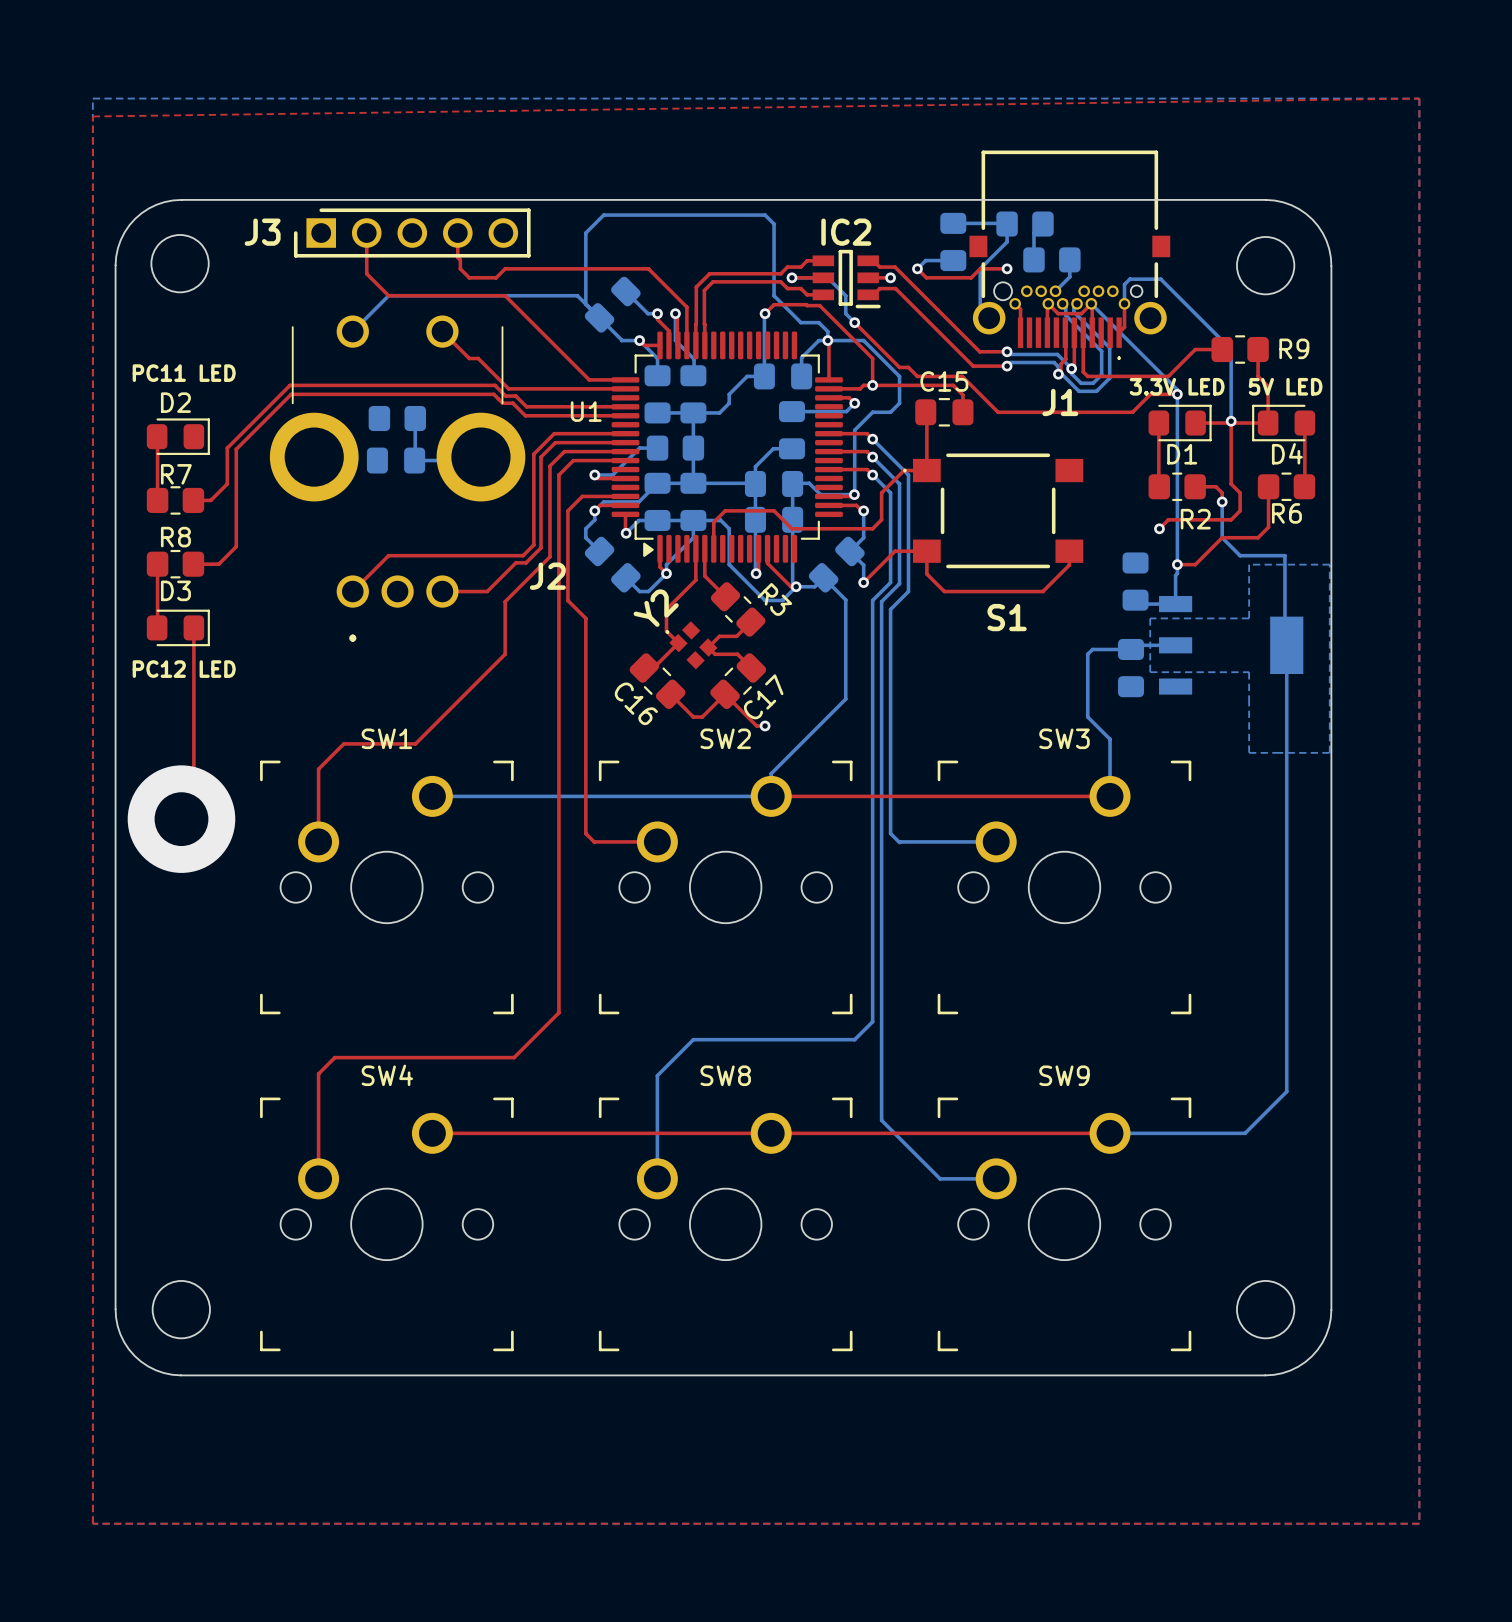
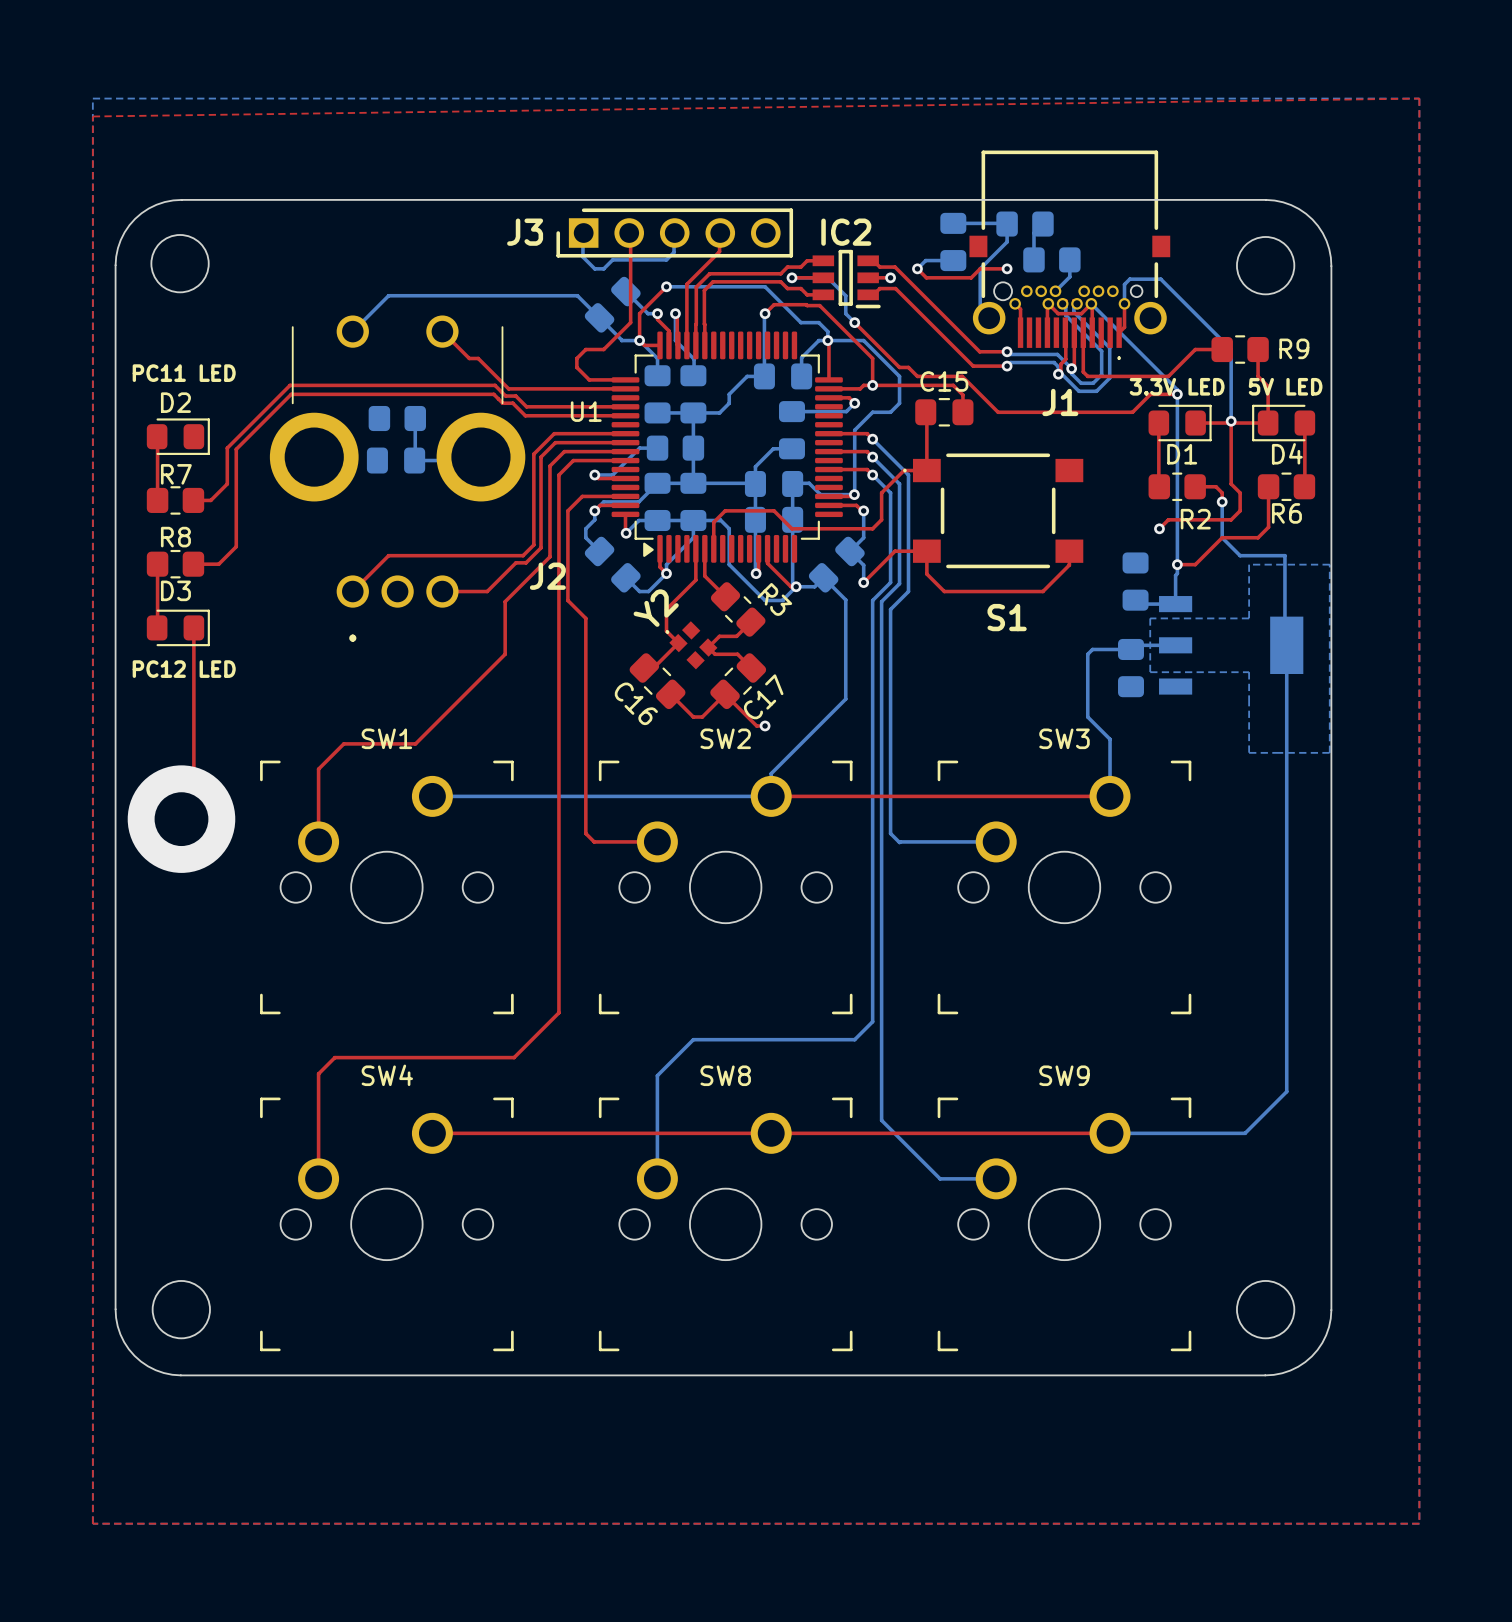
top track: (366, 233) (366, 273) (388, 295) (505, 295) (576, 367) -> (628, 233) (630, 235) (630, 322) (603, 349) (585, 349) (576, 358) (576, 367)
J3 position: (412, 233) -> (674, 233)
top track: (457, 233) (457, 257) (460, 259) (460, 268) (469, 277) (496, 277) (505, 268) (648, 268) (686, 307) -> (719, 233) (719, 251) (686, 284) (686, 307)
bottom track: none -> (582, 233) (582, 257) (594, 268) (603, 268) (612, 259) (666, 259) (674, 252) (674, 233)
top track: none -> (666, 286) (639, 313) (639, 340)
via: none -> (666, 286)
bottom track: (774, 295) (774, 224) (765, 215) (603, 215) (585, 233) (585, 304) -> (774, 295) (765, 286) (666, 286)

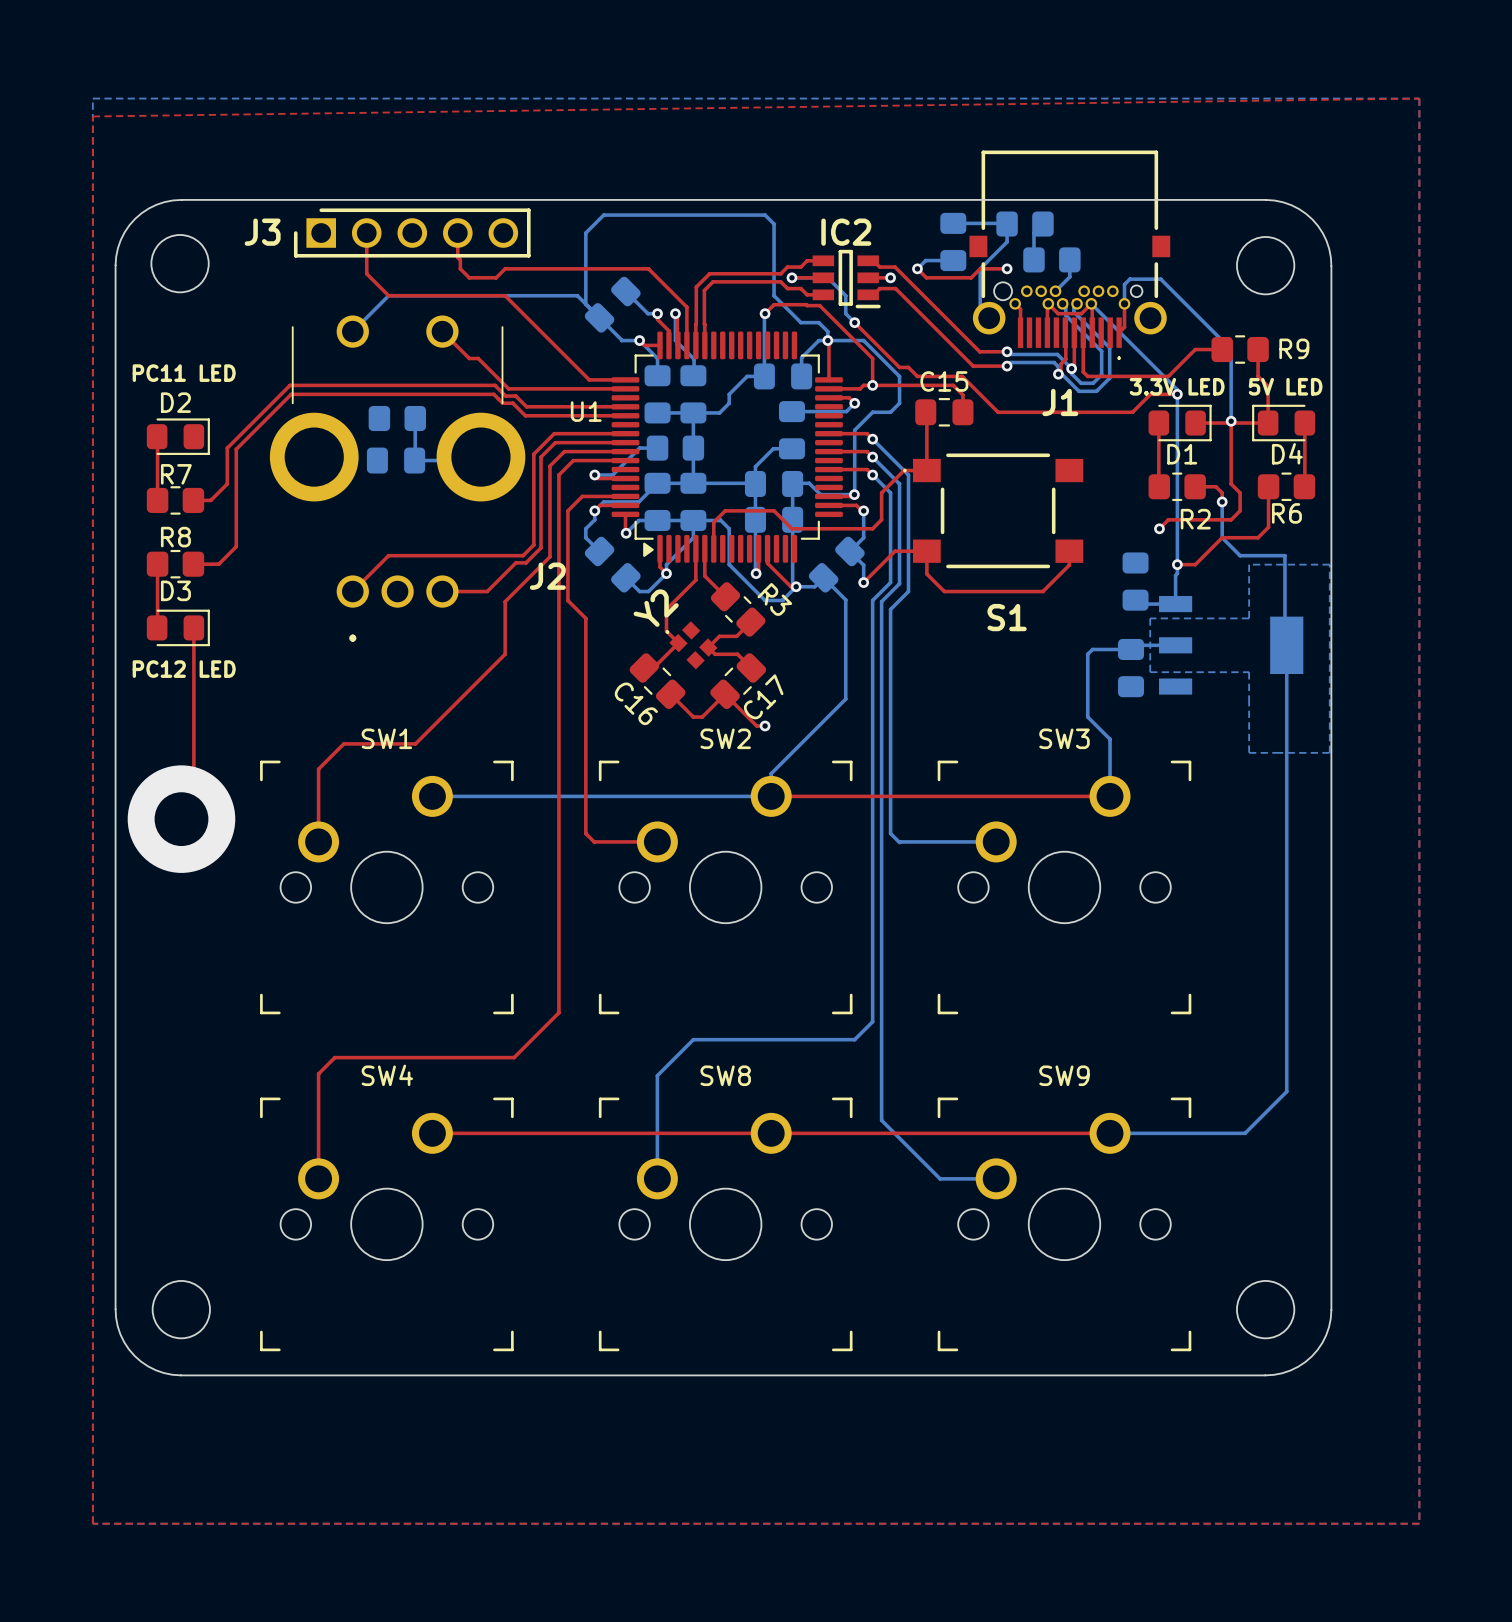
bottom track: (582, 233) (582, 257) (594, 268) (603, 268) (612, 259) (666, 259) (674, 252) (674, 233) -> none
top track: (628, 233) (630, 235) (630, 322) (603, 349) (585, 349) (576, 358) (576, 367) -> (366, 233) (366, 273) (388, 295) (505, 295) (576, 367)
J3 position: (674, 233) -> (412, 233)
top track: (719, 233) (719, 251) (686, 284) (686, 307) -> (457, 233) (457, 257) (460, 259) (460, 268) (469, 277) (496, 277) (505, 268) (648, 268) (686, 307)
top track: (666, 286) (639, 313) (639, 340) -> none
bottom track: (666, 286) (765, 286) (774, 295) -> (585, 304) (585, 233) (603, 215) (765, 215) (774, 224) (774, 295)
via: (666, 286) -> none

